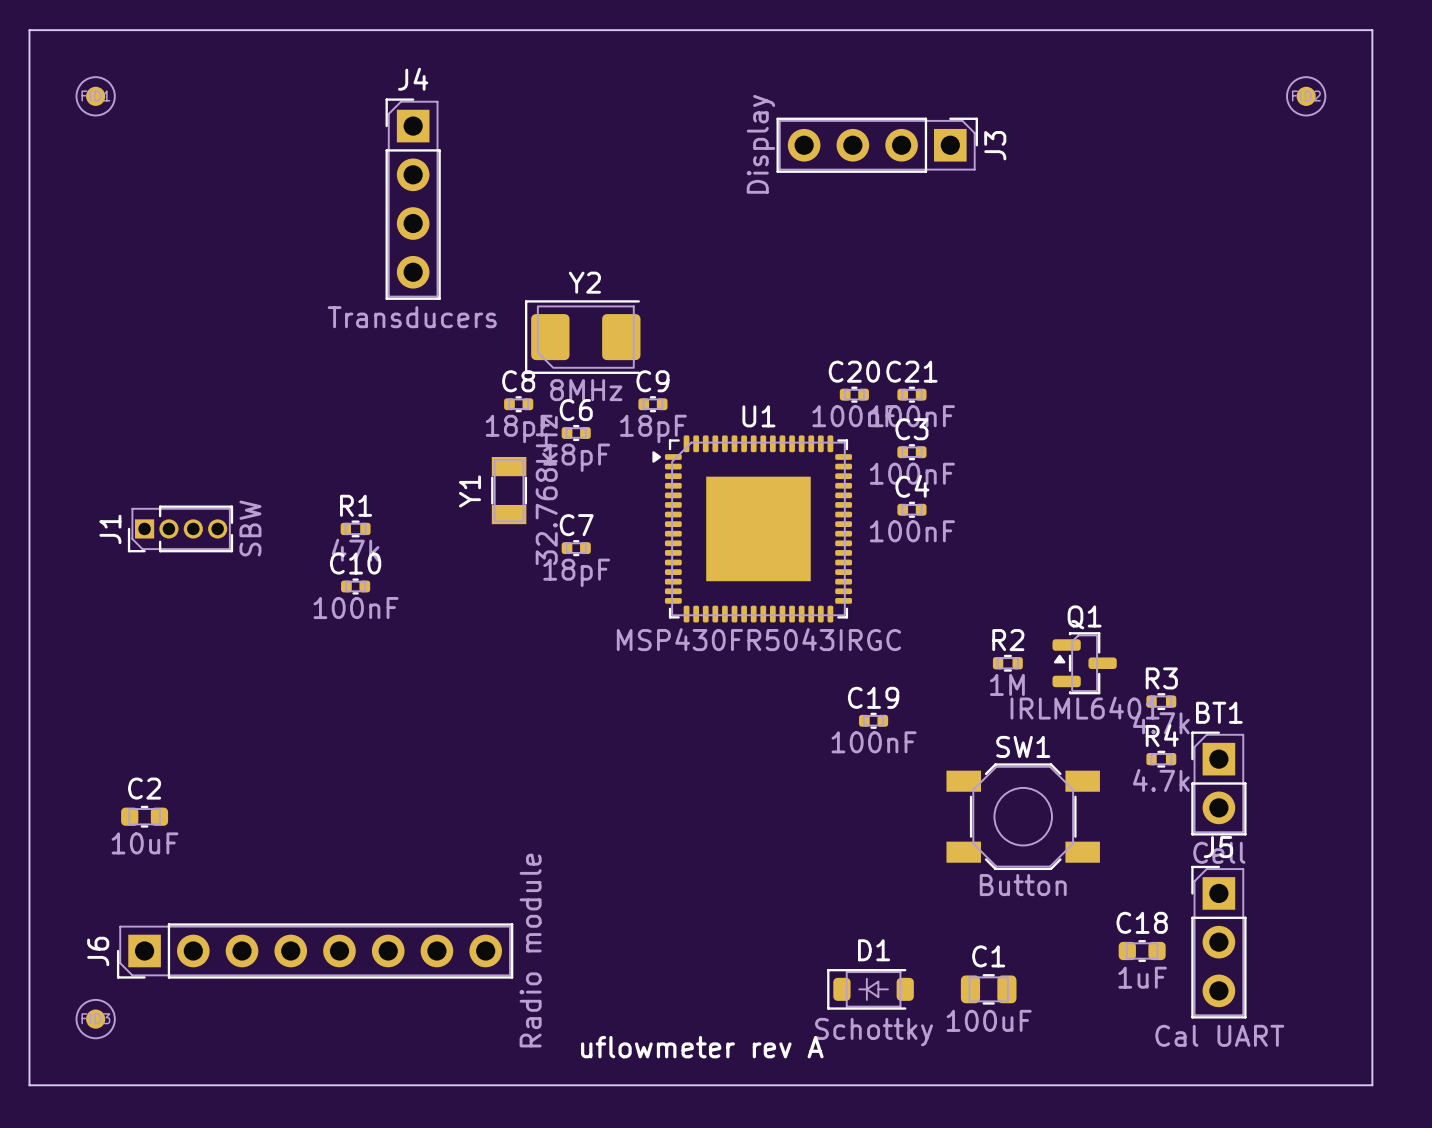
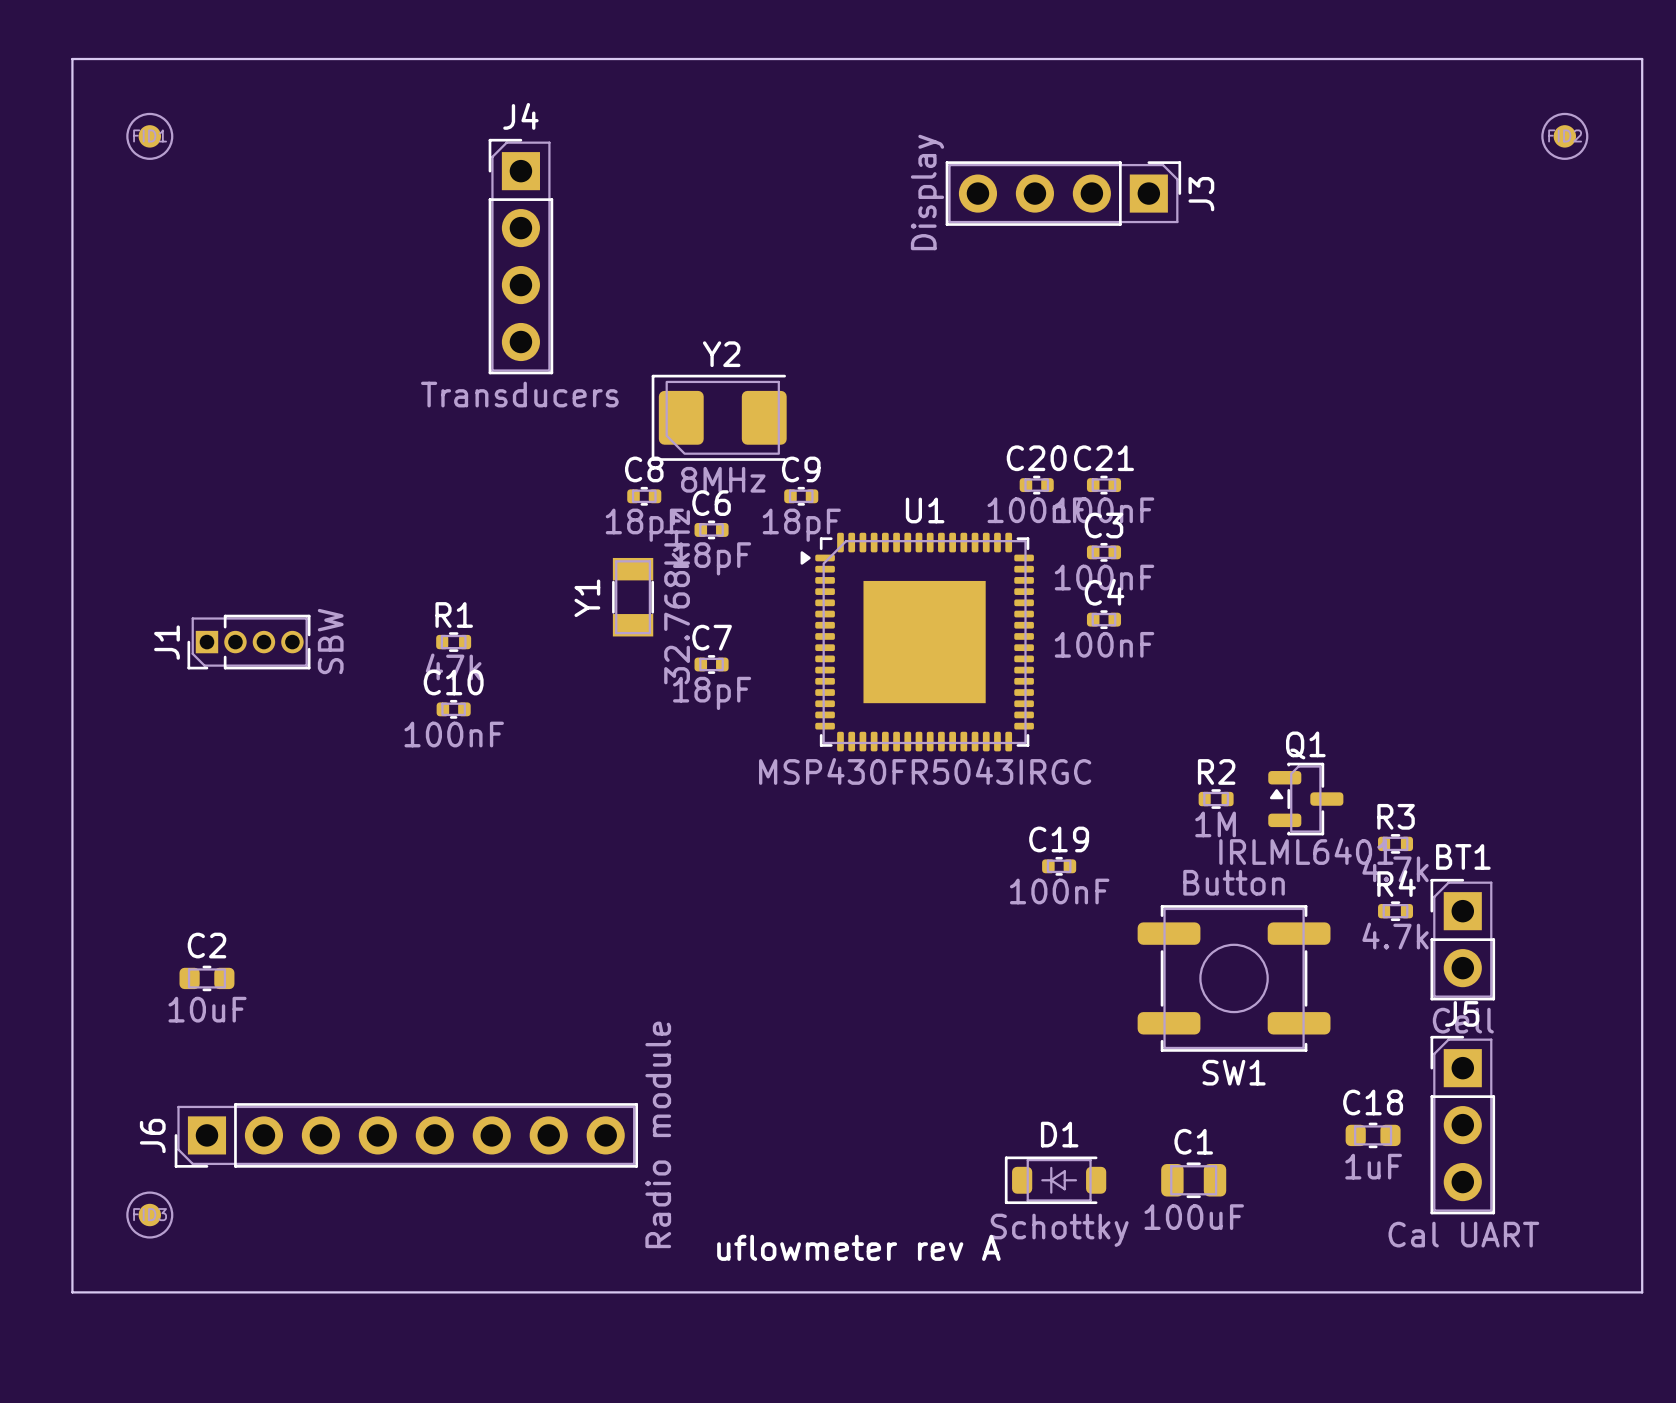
SW1 name position: SW1 (1023, 746) -> SW1 (1234, 1072)
SW1 footprint: [946, 763, 1100, 871] -> [1137, 905, 1331, 1052]
SW1 value position: Button (1023, 885) -> Button (1234, 882)

